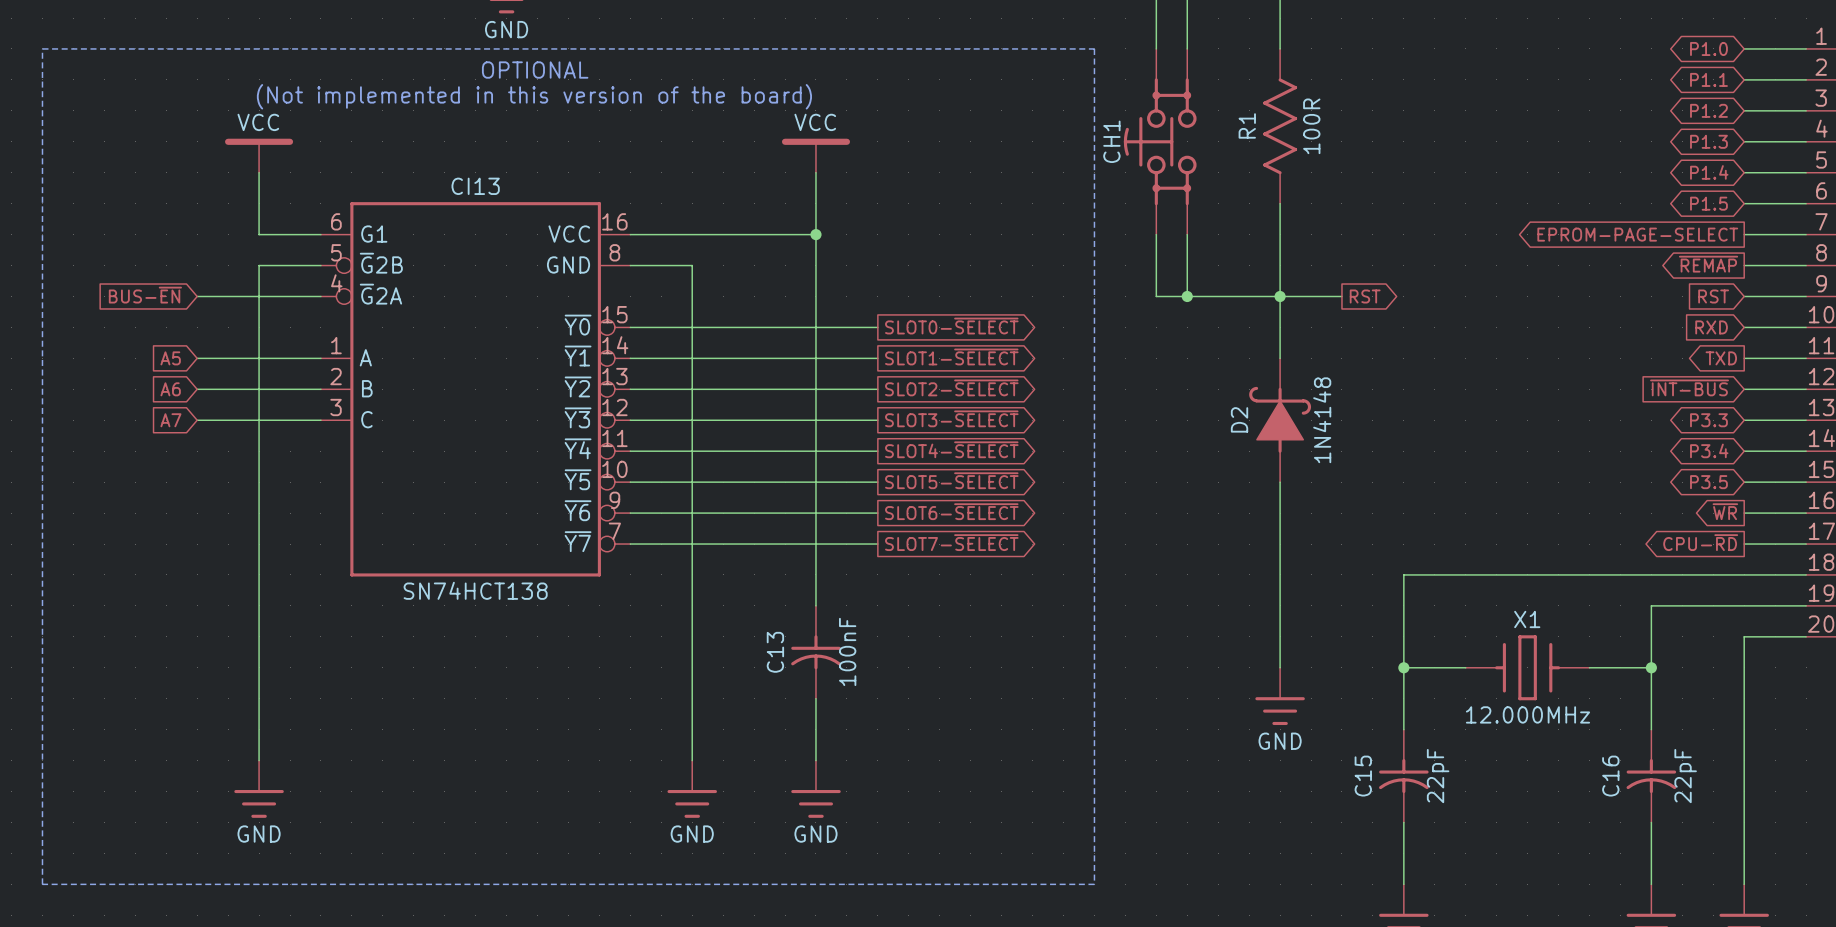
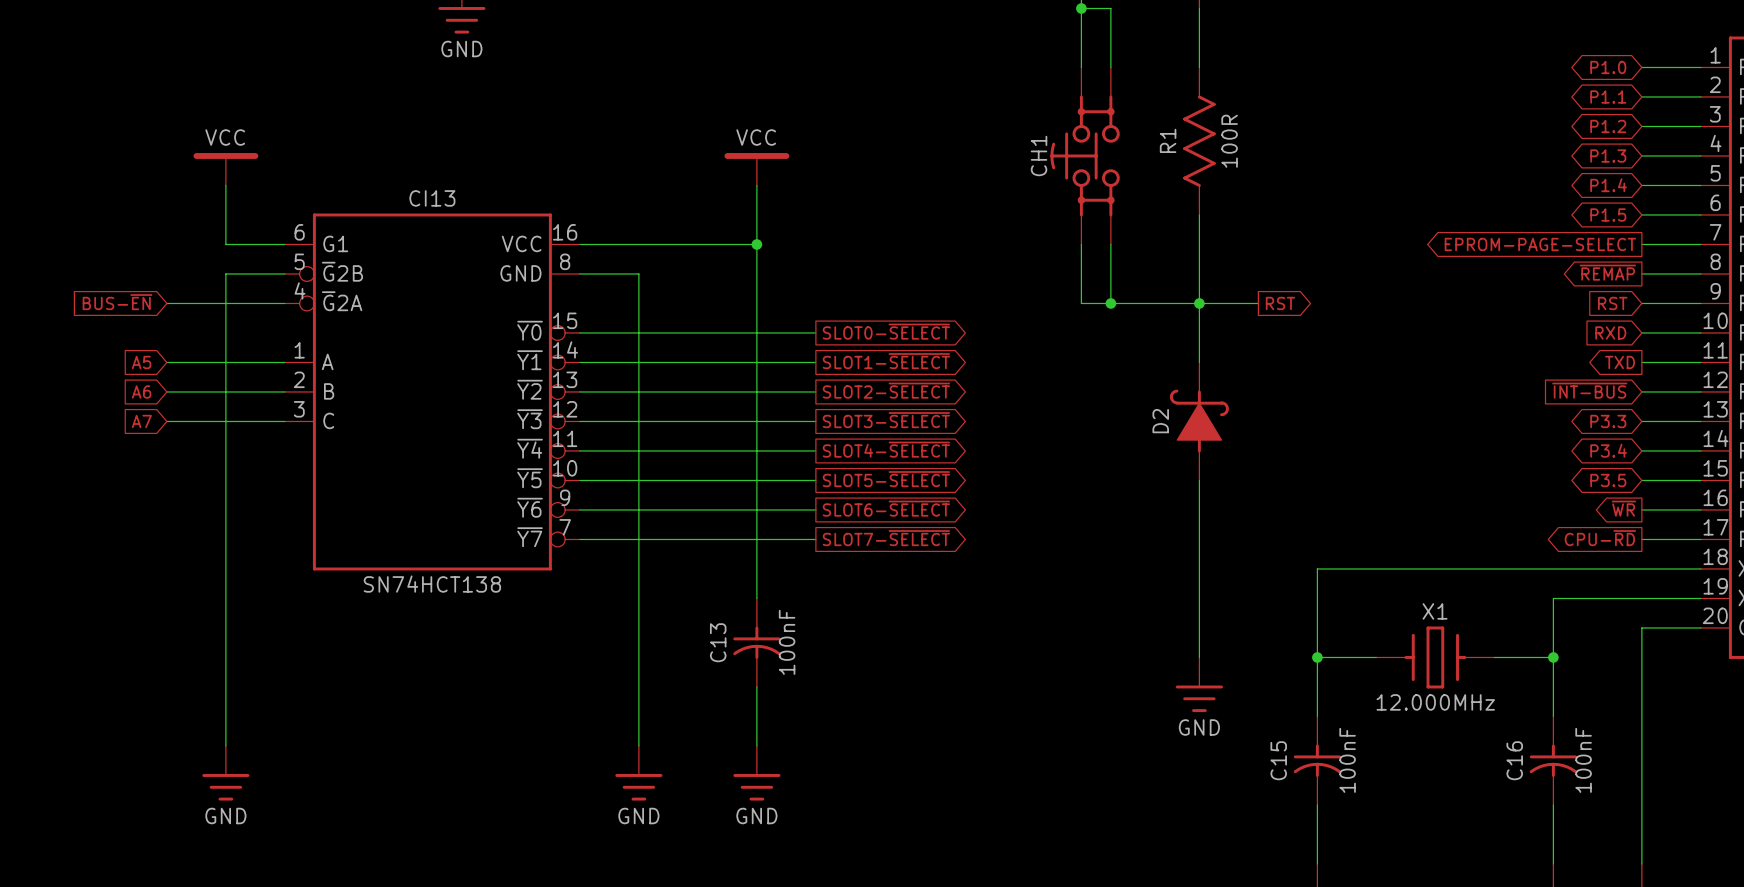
line: (42, 48) (1094, 48) (1094, 884) (42, 884) (42, 48) -> none
text: OPTIONAL (535, 70) -> none
text: (Not implemented in this version of the board) (534, 96) -> none
D2 value: 1N4148 (1322, 420) -> none
C15 value: 22pF (1438, 776) -> 100nF (1347, 760)
C16 value: 22pF (1685, 776) -> 100nF (1583, 760)

